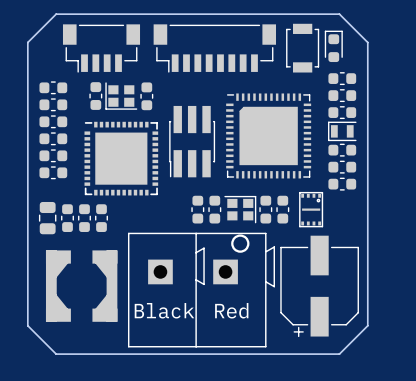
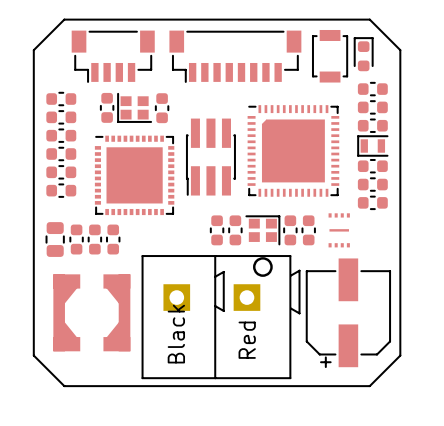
part footprint: [299, 191, 324, 228] -> [328, 213, 350, 248]
part text rotation: 0° (164, 310) -> 90° counterclockwise (176, 334)
part text rotation: 0° (231, 310) -> 90° counterclockwise (247, 340)

